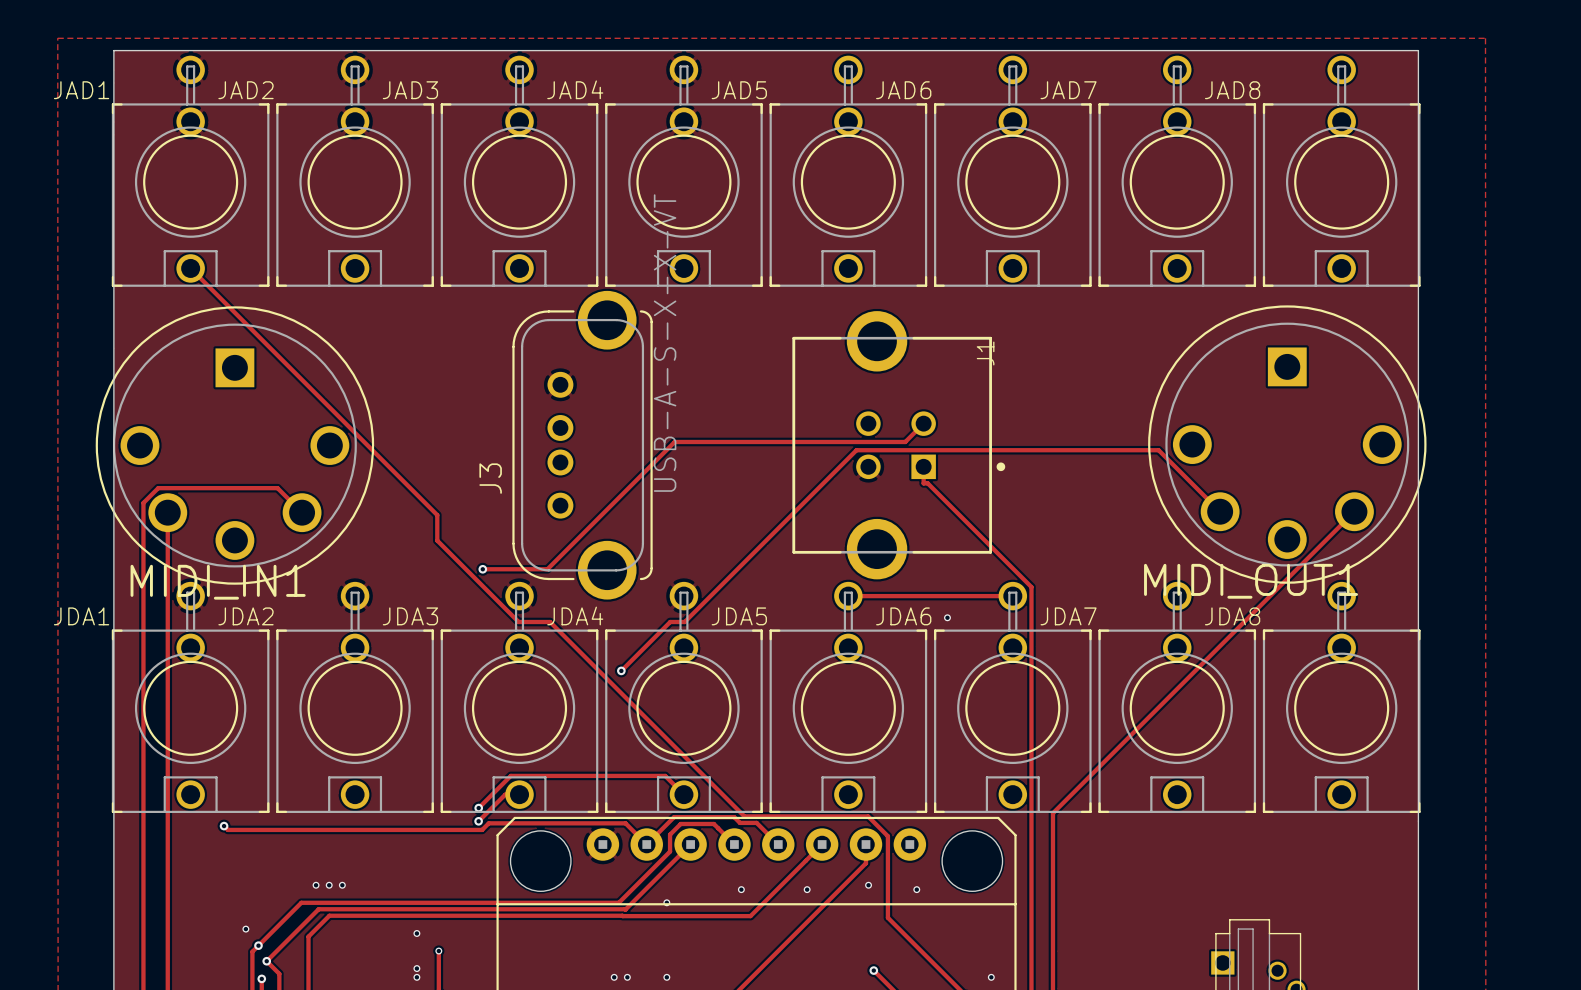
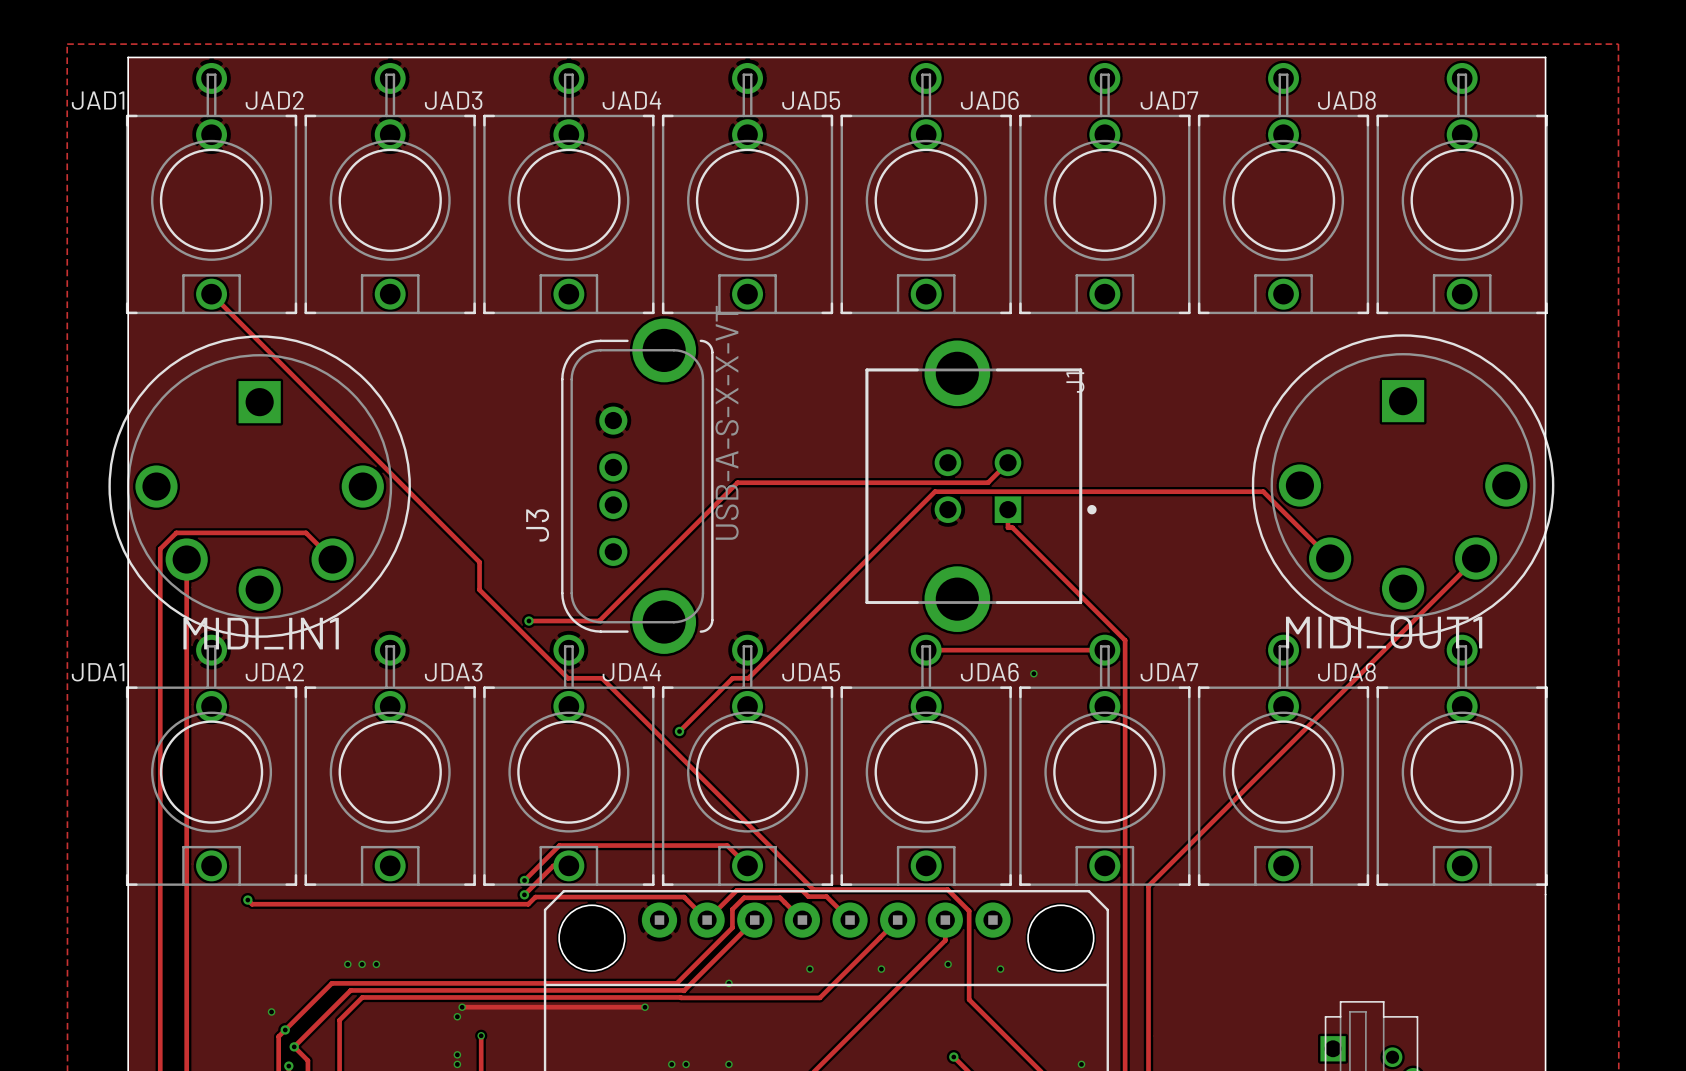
track: none -> (462, 1007) (645, 1007)
via: none -> (462, 1007)
via: none -> (645, 1007)

